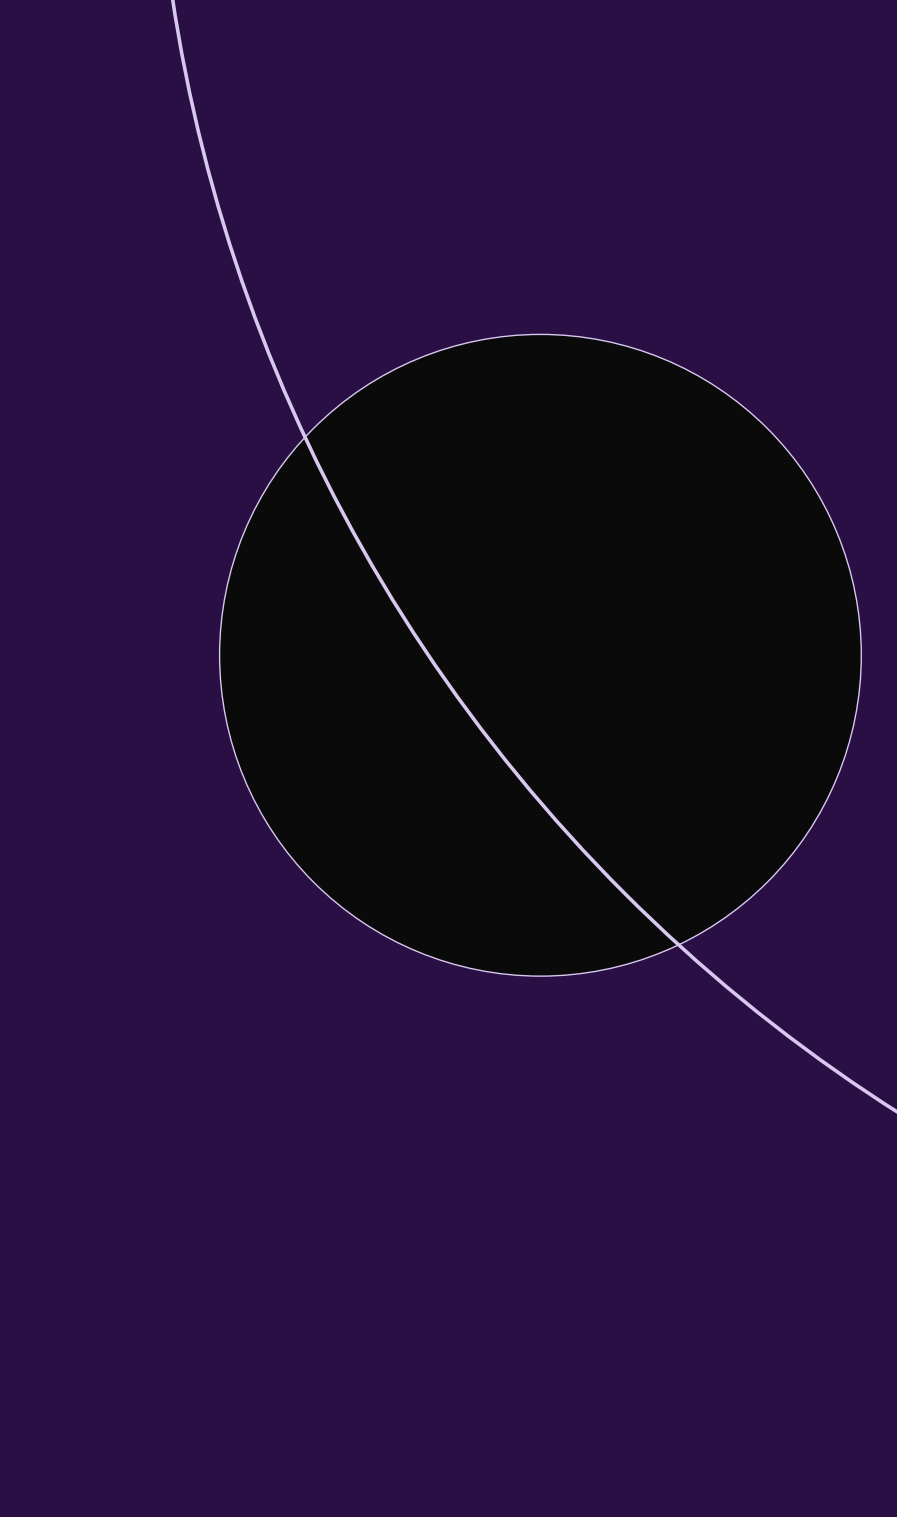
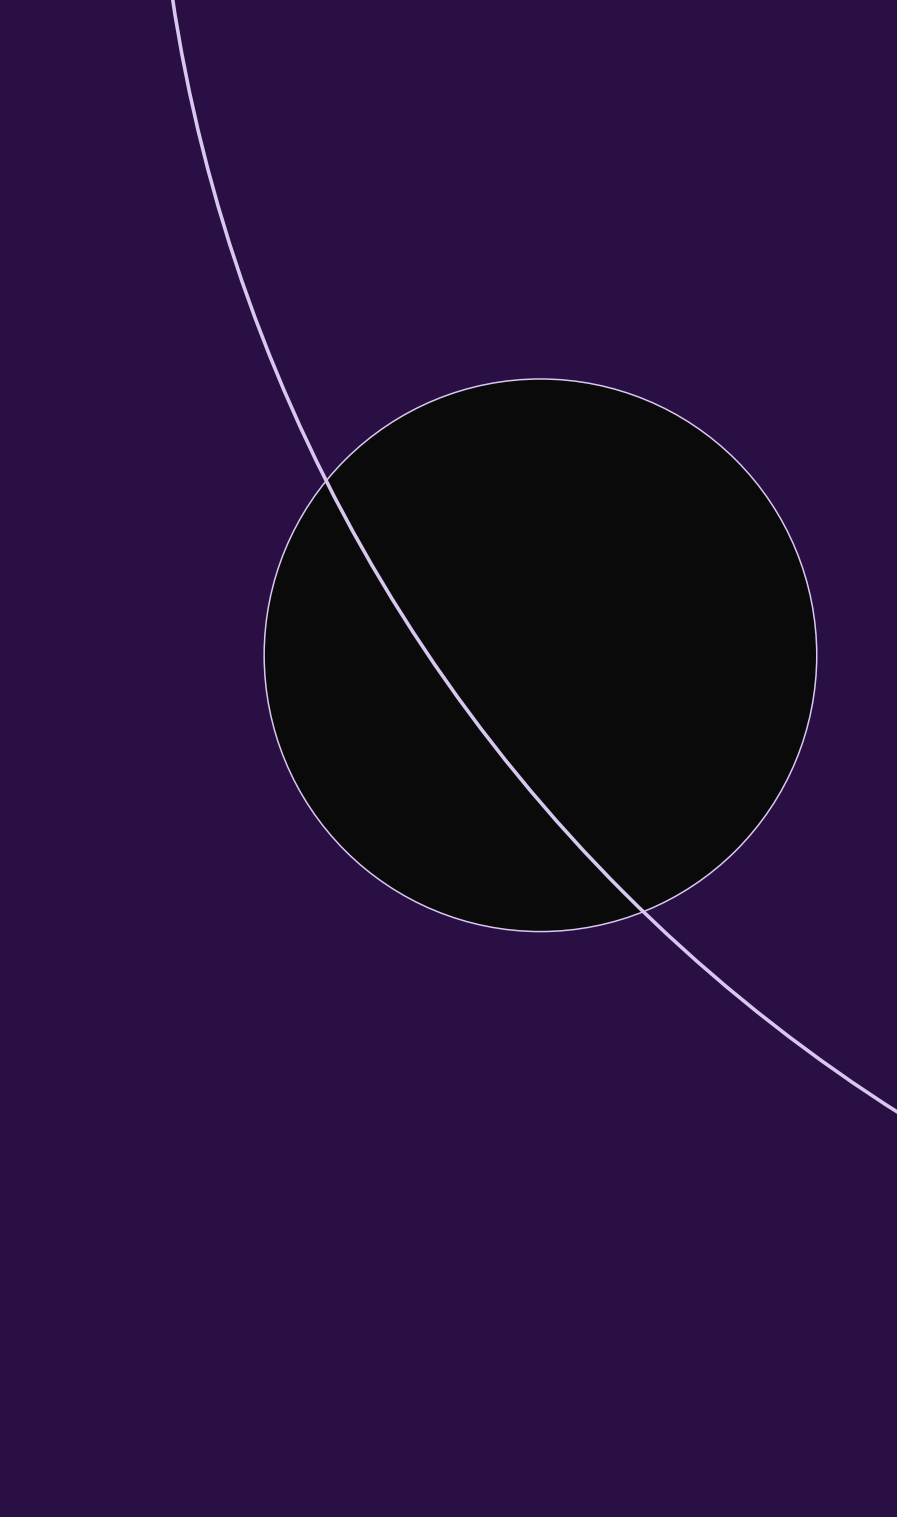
part footprint: [219, 334, 862, 977] -> [264, 378, 817, 932]

